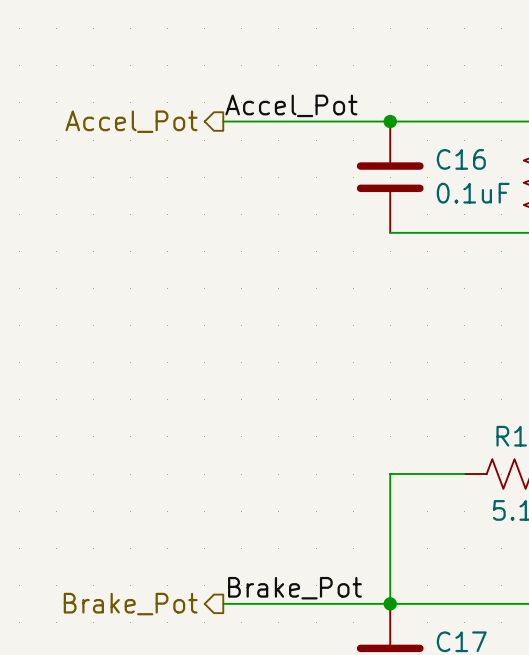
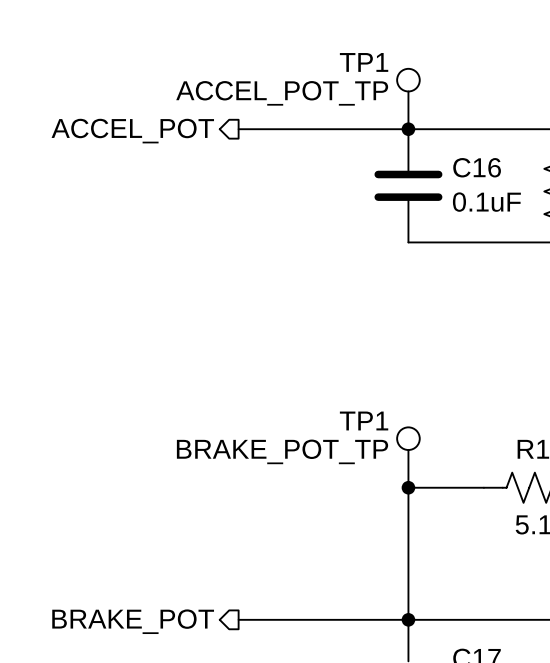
TP1: none -> ACCEL_POT_TP (408, 99)
label: Accel_Pot (291, 105) -> none
hierarchical label: Accel_Pot (131, 121) -> ACCEL_POT (132, 131)
TP1: none -> BRAKE_POT_TP (408, 457)
junction: none -> (408, 487)
label: Brake_Pot (294, 588) -> none
hierarchical label: Brake_Pot (130, 604) -> BRAKE_POT (133, 621)

